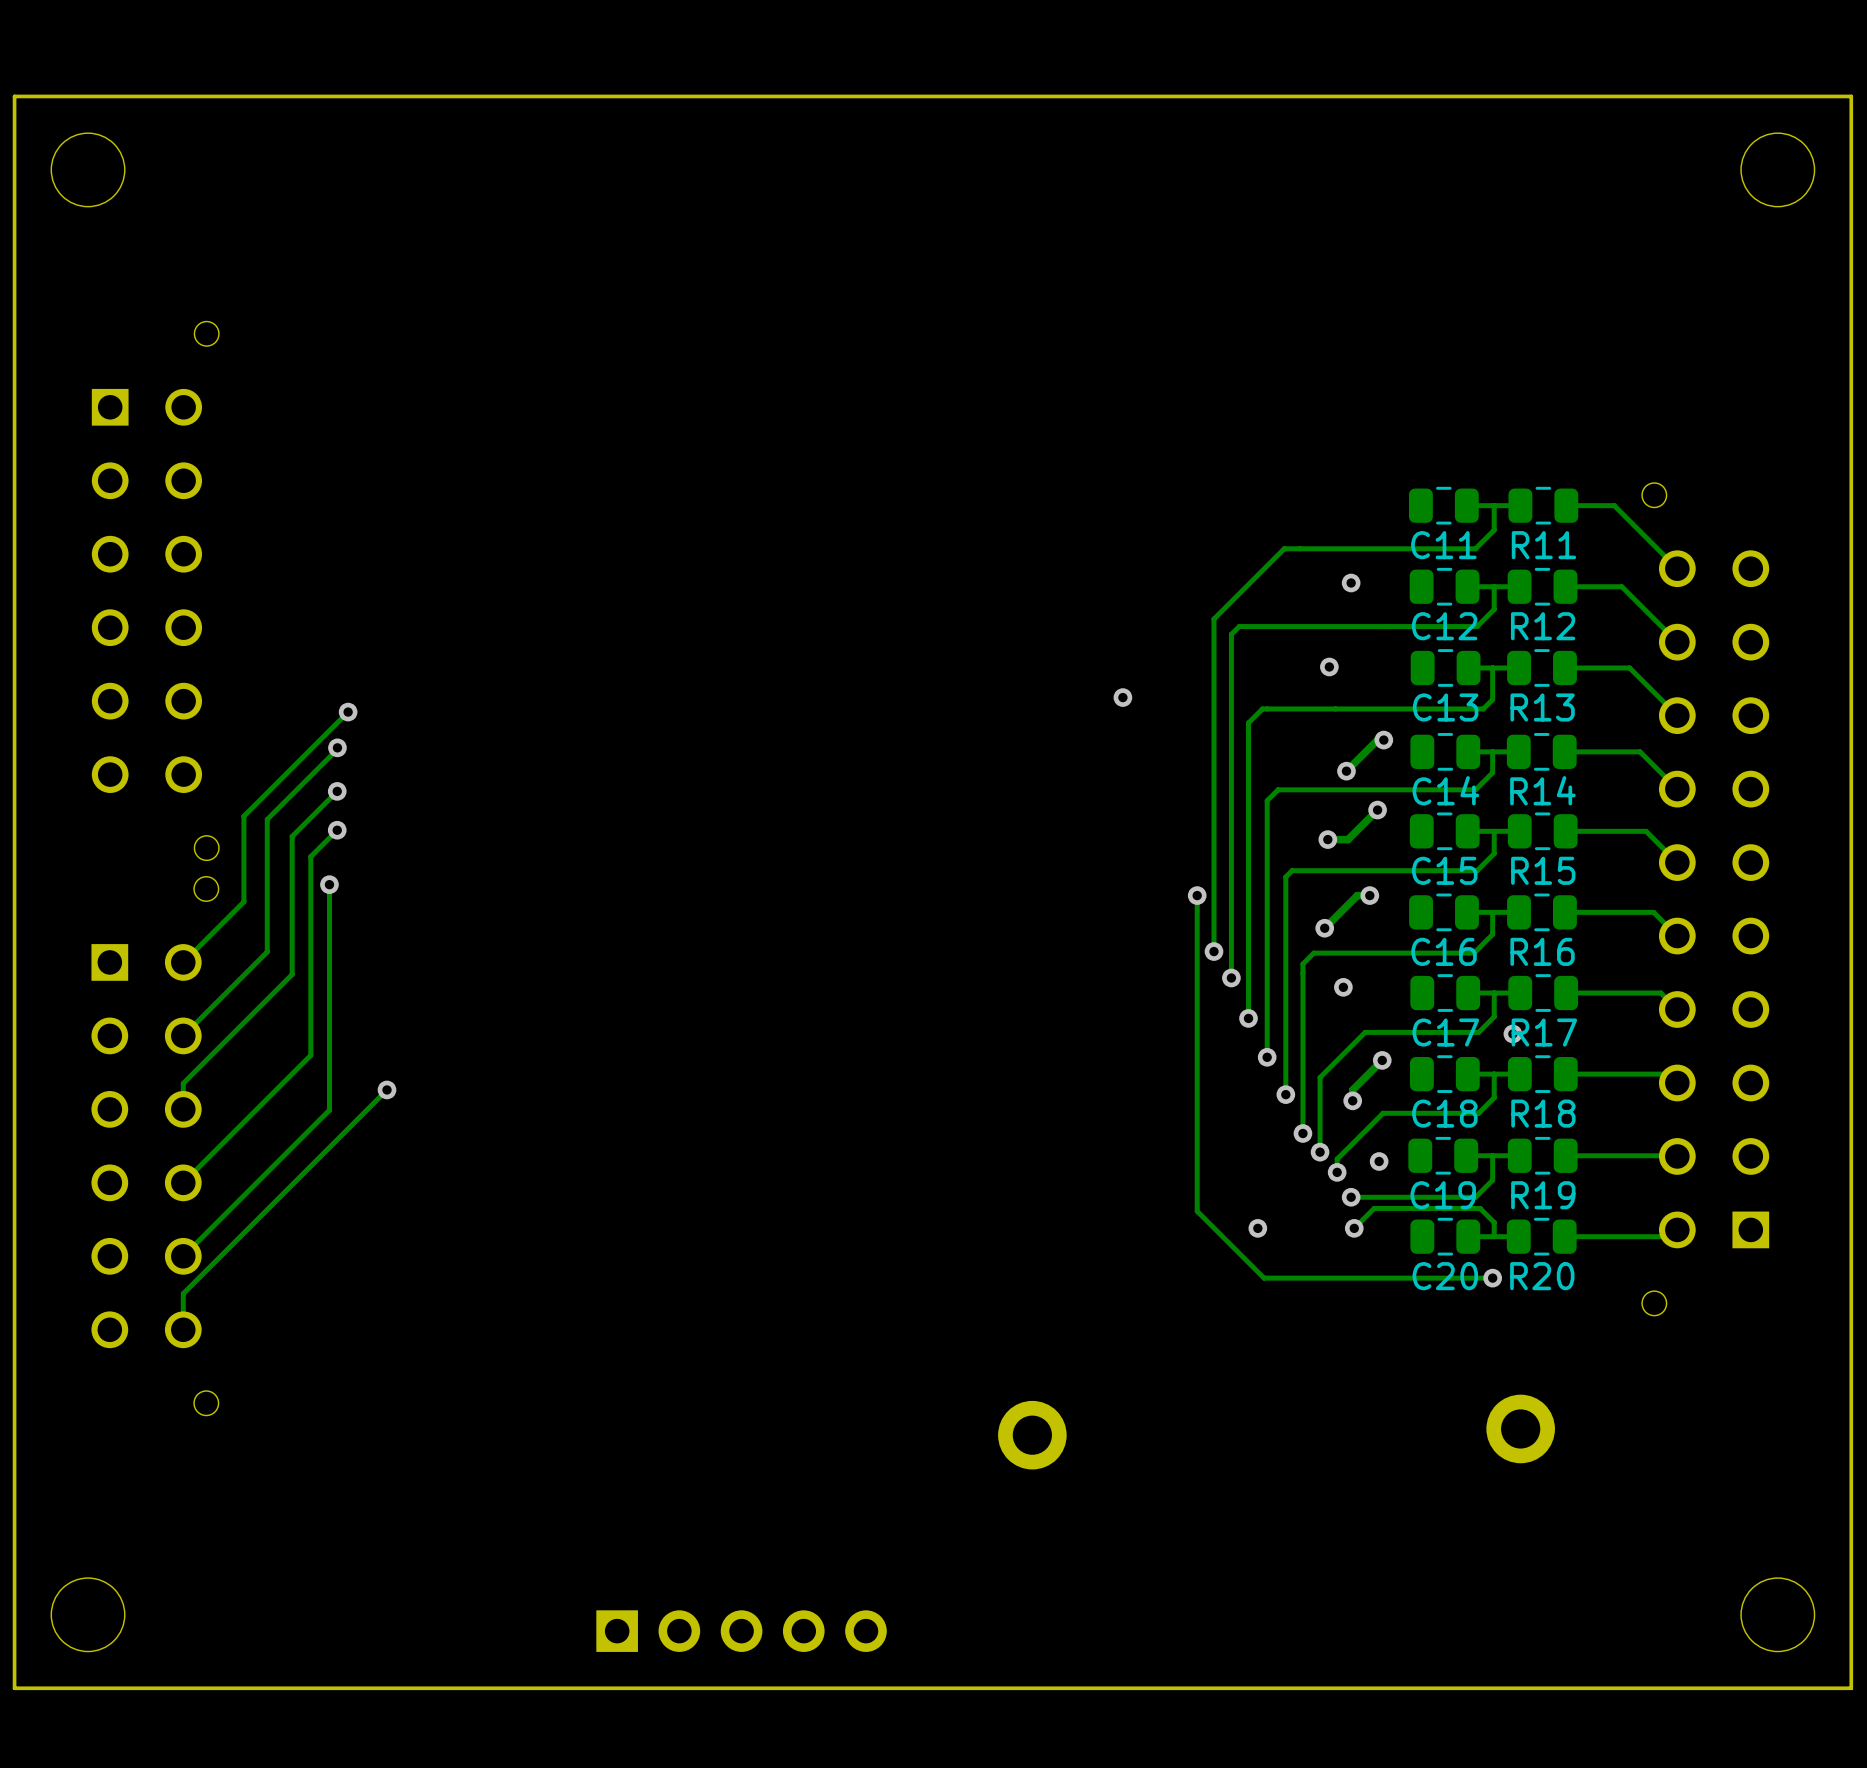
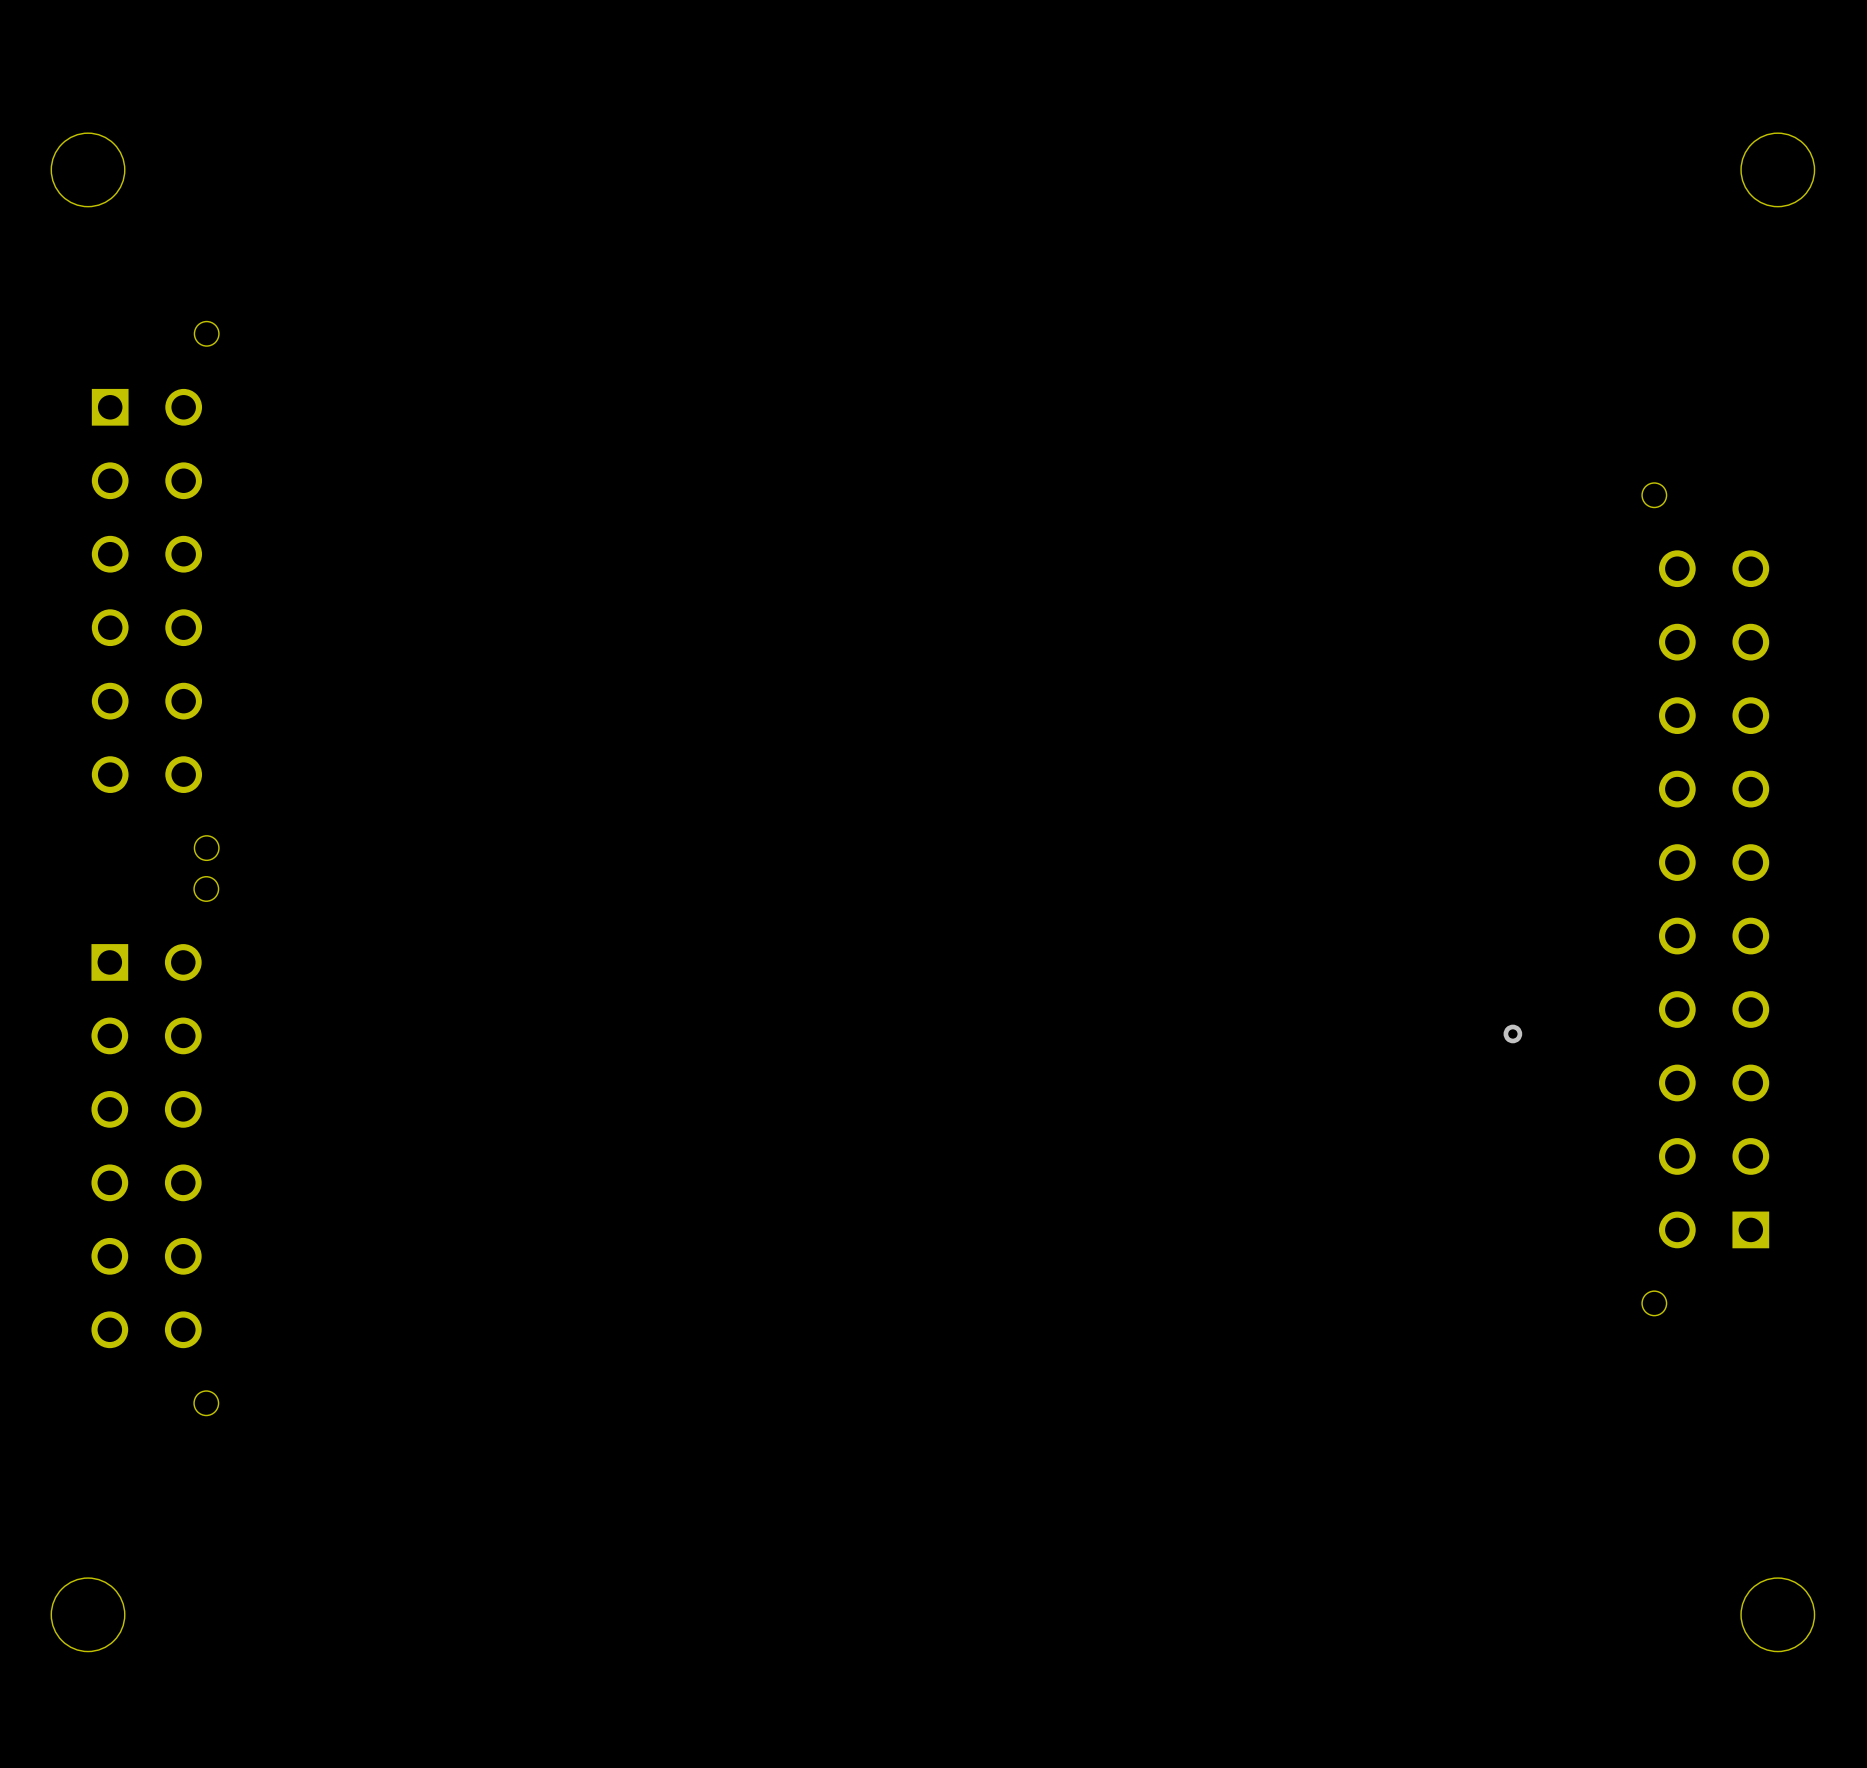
board edge: (1851, 96) (1851, 1688) (14, 1688) (14, 96) (1851, 96) -> none
C11: (1443, 505) -> none
track: (1494, 505) (1494, 530) (1475, 548) (1284, 548) (1213, 619) (1213, 951) -> none
track: (1520, 505) (1466, 505) -> none
R11: (1543, 505) -> none
track: (1566, 505) (1614, 505) (1677, 568) -> none
via: (1351, 583) -> none
C12: (1444, 586) -> none
track: (1494, 586) (1494, 609) (1477, 626) (1239, 626) (1231, 634) (1231, 977) -> none
track: (1519, 586) (1467, 586) -> none
R12: (1542, 586) -> none
track: (1565, 586) (1621, 586) (1677, 642) -> none
via: (1329, 666) -> none
C13: (1445, 667) -> none
track: (1492, 667) (1492, 699) (1483, 708) (1262, 708) (1248, 722) (1248, 1018) -> none
track: (1519, 667) (1468, 667) -> none
R13: (1542, 667) -> none
track: (1564, 667) (1629, 667) (1677, 715) -> none
via: (1122, 697) -> none
track: (348, 712) (243, 816) (243, 901) (183, 962) -> none
via: (348, 712) -> none
track: (1383, 740) (1377, 740) (1346, 771) -> none
via: (1383, 740) -> none
track: (337, 747) (267, 819) (267, 951) (183, 1035) -> none
via: (337, 747) -> none
C14: (1445, 751) -> none
track: (1492, 751) (1492, 772) (1475, 789) (1278, 789) (1267, 800) (1267, 1057) -> none
track: (1518, 751) (1468, 751) -> none
R14: (1541, 751) -> none
track: (1564, 751) (1640, 751) (1677, 789) -> none
via: (1346, 771) -> none
track: (337, 791) (292, 836) (292, 974) (183, 1083) (183, 1109) -> none
via: (337, 791) -> none
track: (1377, 810) (1348, 839) (1327, 839) -> none
via: (1377, 810) -> none
track: (337, 830) (310, 856) (310, 1055) (183, 1182) -> none
via: (337, 830) -> none
C15: (1444, 831) -> none
track: (1494, 831) (1494, 853) (1477, 870) (1292, 870) (1285, 876) (1285, 1094) -> none
track: (1519, 831) (1467, 831) -> none
R15: (1542, 831) -> none
track: (1565, 831) (1646, 831) (1677, 862) -> none
via: (1327, 839) -> none
track: (329, 884) (329, 1110) (183, 1256) -> none
via: (329, 884) -> none
track: (1197, 895) (1197, 1211) (1264, 1278) (1492, 1278) -> none
via: (1197, 895) -> none
track: (1369, 895) (1357, 895) (1324, 928) -> none
via: (1369, 895) -> none
C16: (1444, 912) -> none
track: (1492, 912) (1492, 934) (1474, 953) (1313, 953) (1302, 964) (1302, 1133) -> none
track: (1519, 912) (1466, 912) -> none
R16: (1541, 912) -> none
track: (1564, 912) (1653, 912) (1677, 936) -> none
via: (1324, 928) -> none
via: (1213, 951) -> none
via: (1231, 977) -> none
via: (1343, 987) -> none
C17: (1445, 993) -> none
track: (1494, 993) (1494, 1016) (1478, 1032) (1365, 1032) (1320, 1077) (1320, 1152) -> none
track: (1520, 993) (1468, 993) -> none
R17: (1543, 993) -> none
track: (1566, 993) (1660, 993) (1677, 1009) -> none
via: (1248, 1018) -> none
via: (1267, 1057) -> none
track: (1382, 1060) (1352, 1089) (1352, 1100) -> none
via: (1382, 1060) -> none
C18: (1444, 1074) -> none
track: (1494, 1074) (1494, 1097) (1478, 1113) (1383, 1113) (1337, 1159) (1337, 1172) -> none
track: (1519, 1074) (1467, 1074) -> none
R18: (1542, 1074) -> none
track: (1565, 1074) (1668, 1074) (1677, 1082) -> none
track: (387, 1089) (183, 1293) (183, 1329) -> none
via: (387, 1089) -> none
via: (1285, 1094) -> none
via: (1352, 1100) -> none
via: (1302, 1133) -> none
via: (1320, 1152) -> none
C19: (1443, 1155) -> none
track: (1492, 1155) (1492, 1180) (1475, 1197) (1351, 1197) -> none
track: (1519, 1155) (1466, 1155) -> none
R19: (1542, 1155) -> none
track: (1565, 1155) (1677, 1156) -> none
via: (1379, 1161) -> none
via: (1337, 1172) -> none
via: (1351, 1197) -> none
via: (1257, 1228) -> none
track: (1354, 1228) (1374, 1208) (1480, 1208) (1494, 1222) (1494, 1236) -> none
via: (1354, 1228) -> none
track: (1677, 1229) (1670, 1236) (1564, 1236) -> none
C20: (1445, 1236) -> none
track: (1518, 1236) (1468, 1236) -> none
R20: (1541, 1236) -> none
via: (1492, 1278) -> none
part: (1520, 1428) -> none
part: (1032, 1435) -> none
part: (741, 1631) -> none

